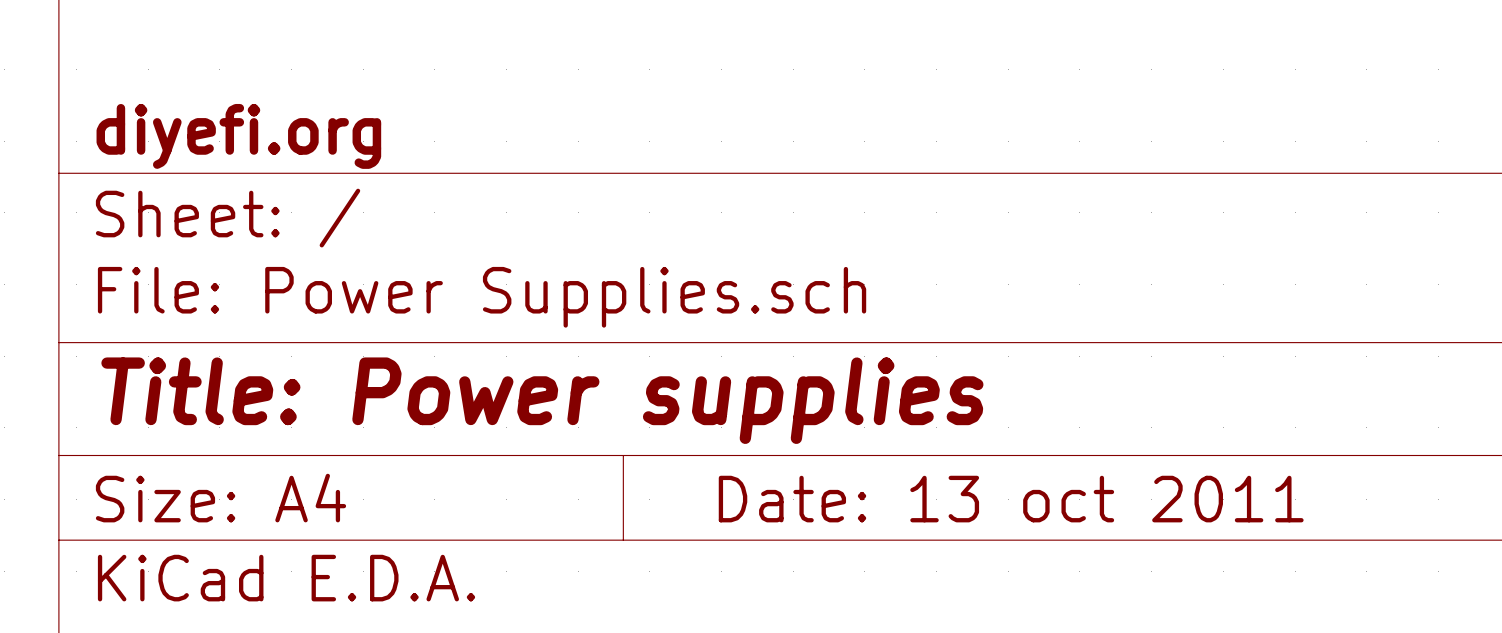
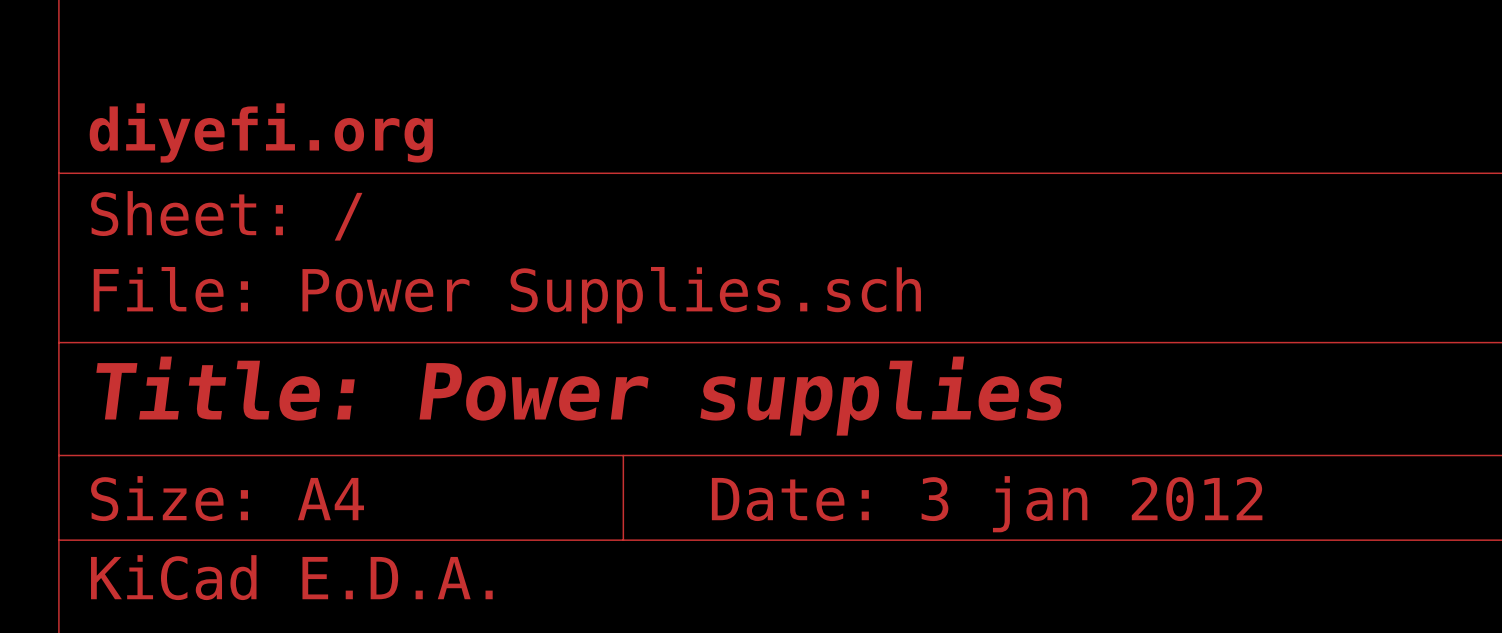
title block: Date: 13 oct 2011 (1011, 499) -> Date: 3 jan 2012 (987, 504)

